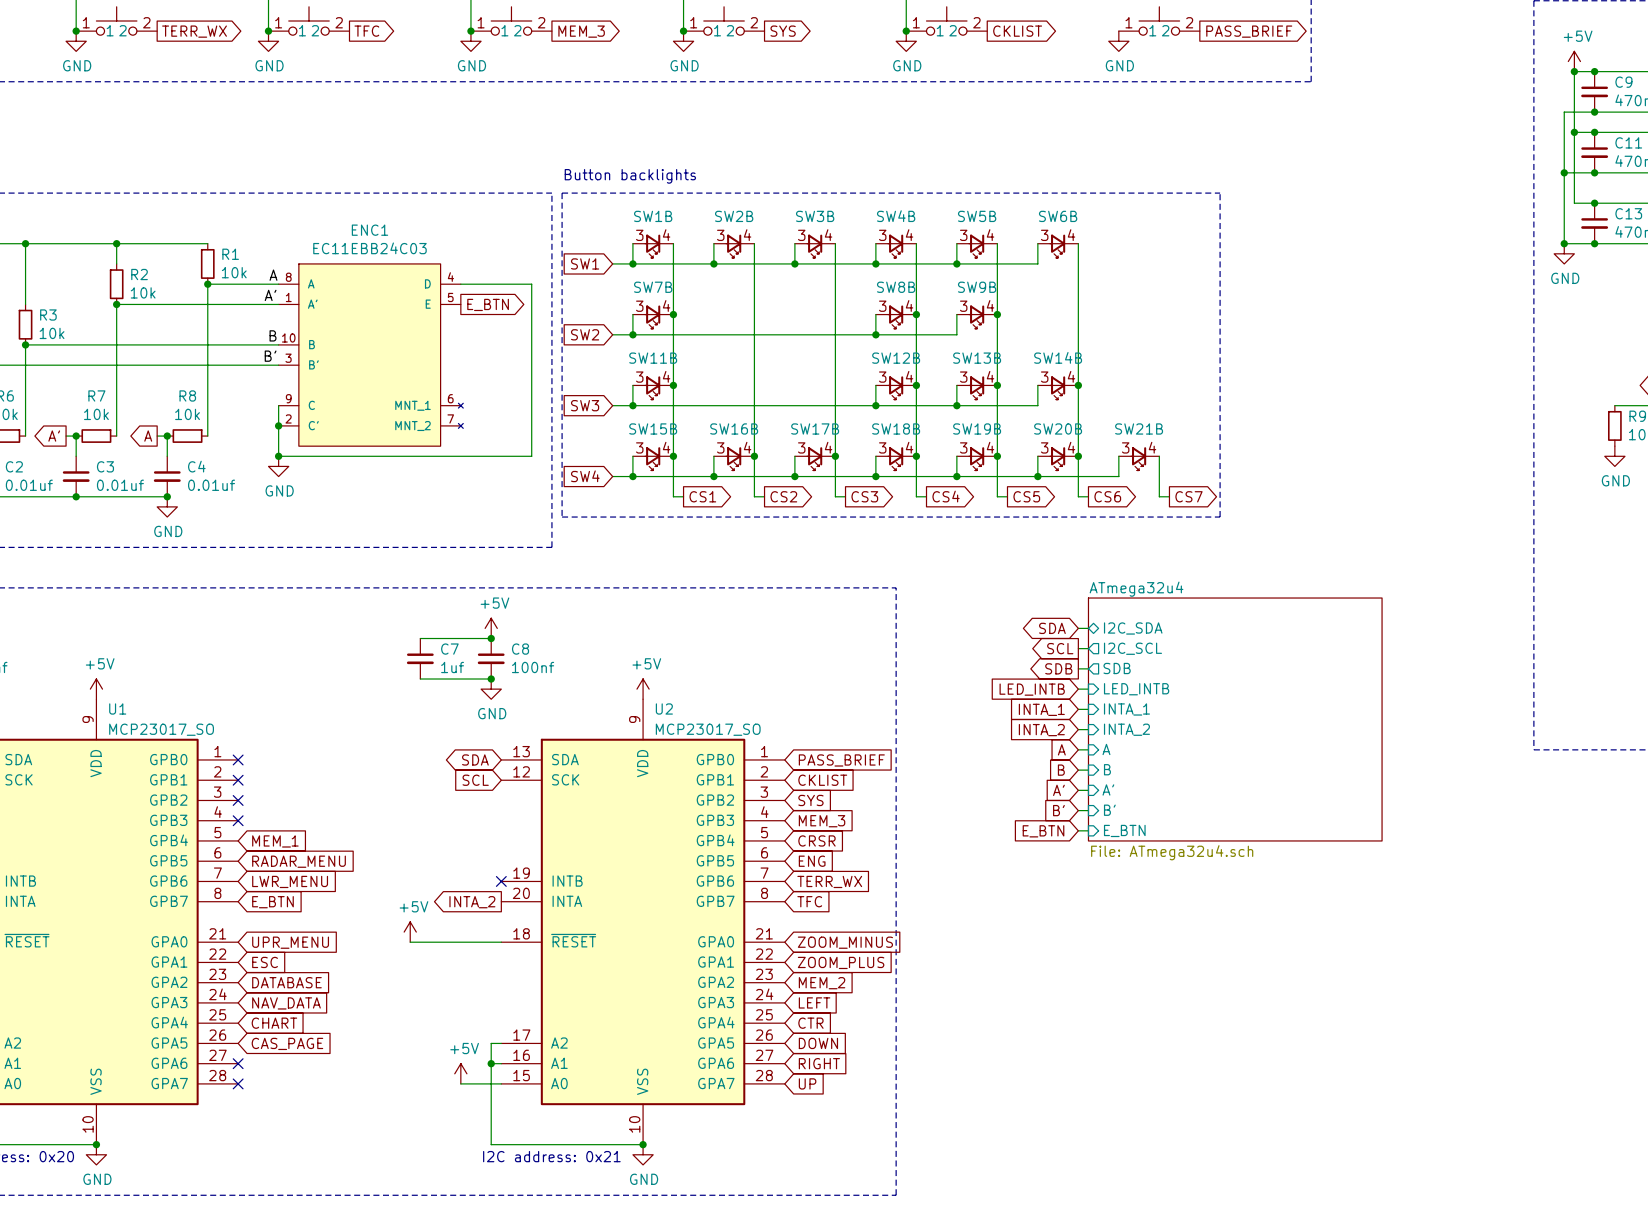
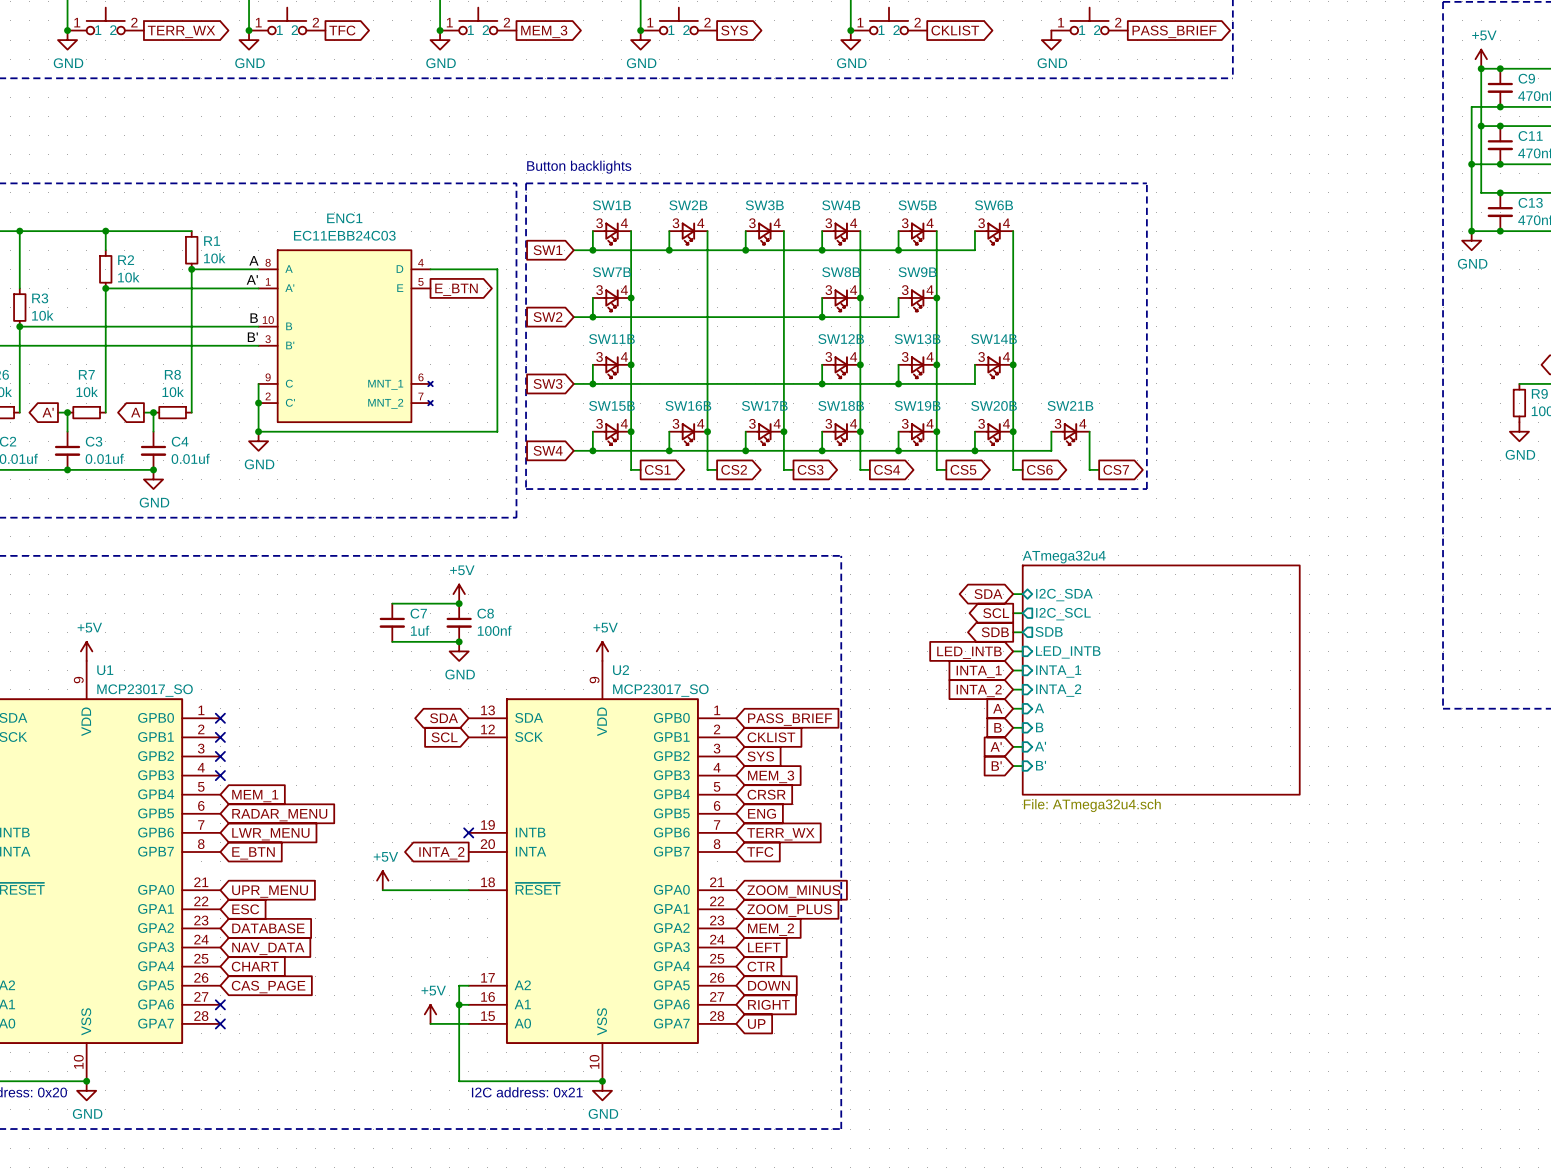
wire: (1078, 830) (1088, 830) -> none
sheet pin: E_BTN (1124, 830) -> none
global label: E_BTN (1043, 831) -> none

